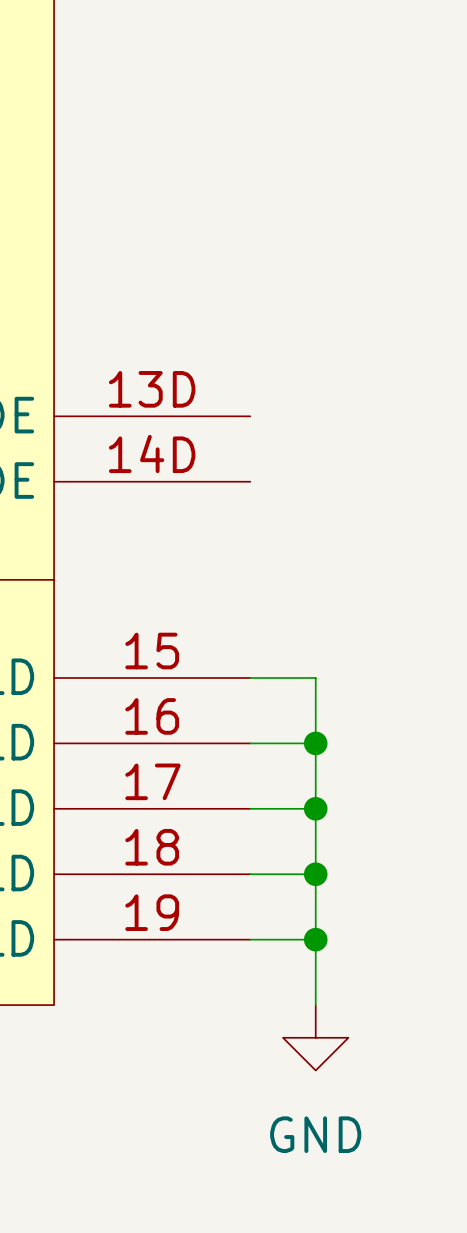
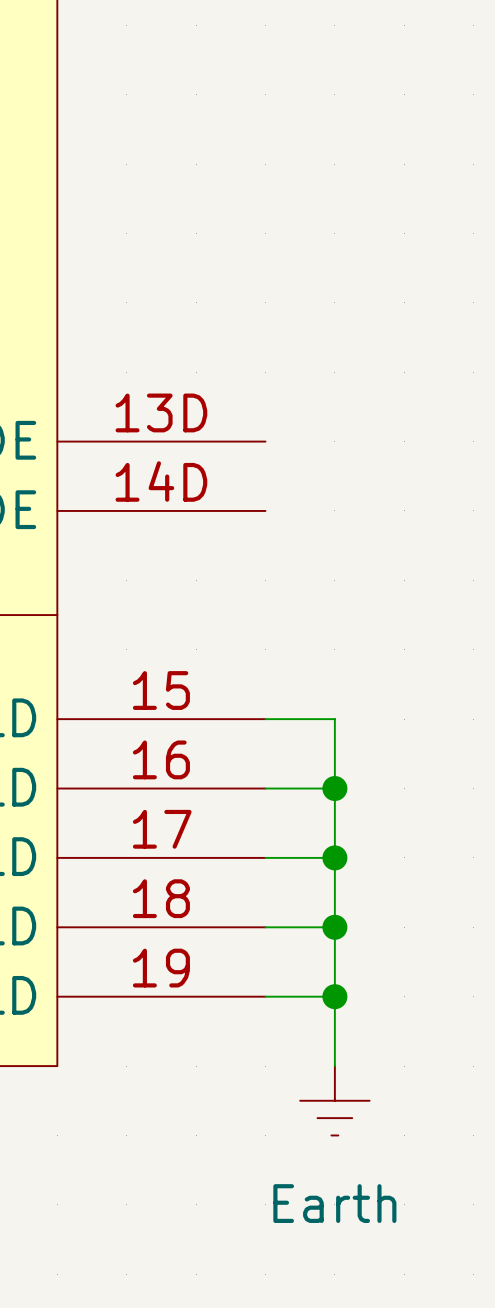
power symbol: GND (315, 1037) -> Earth (334, 1100)

